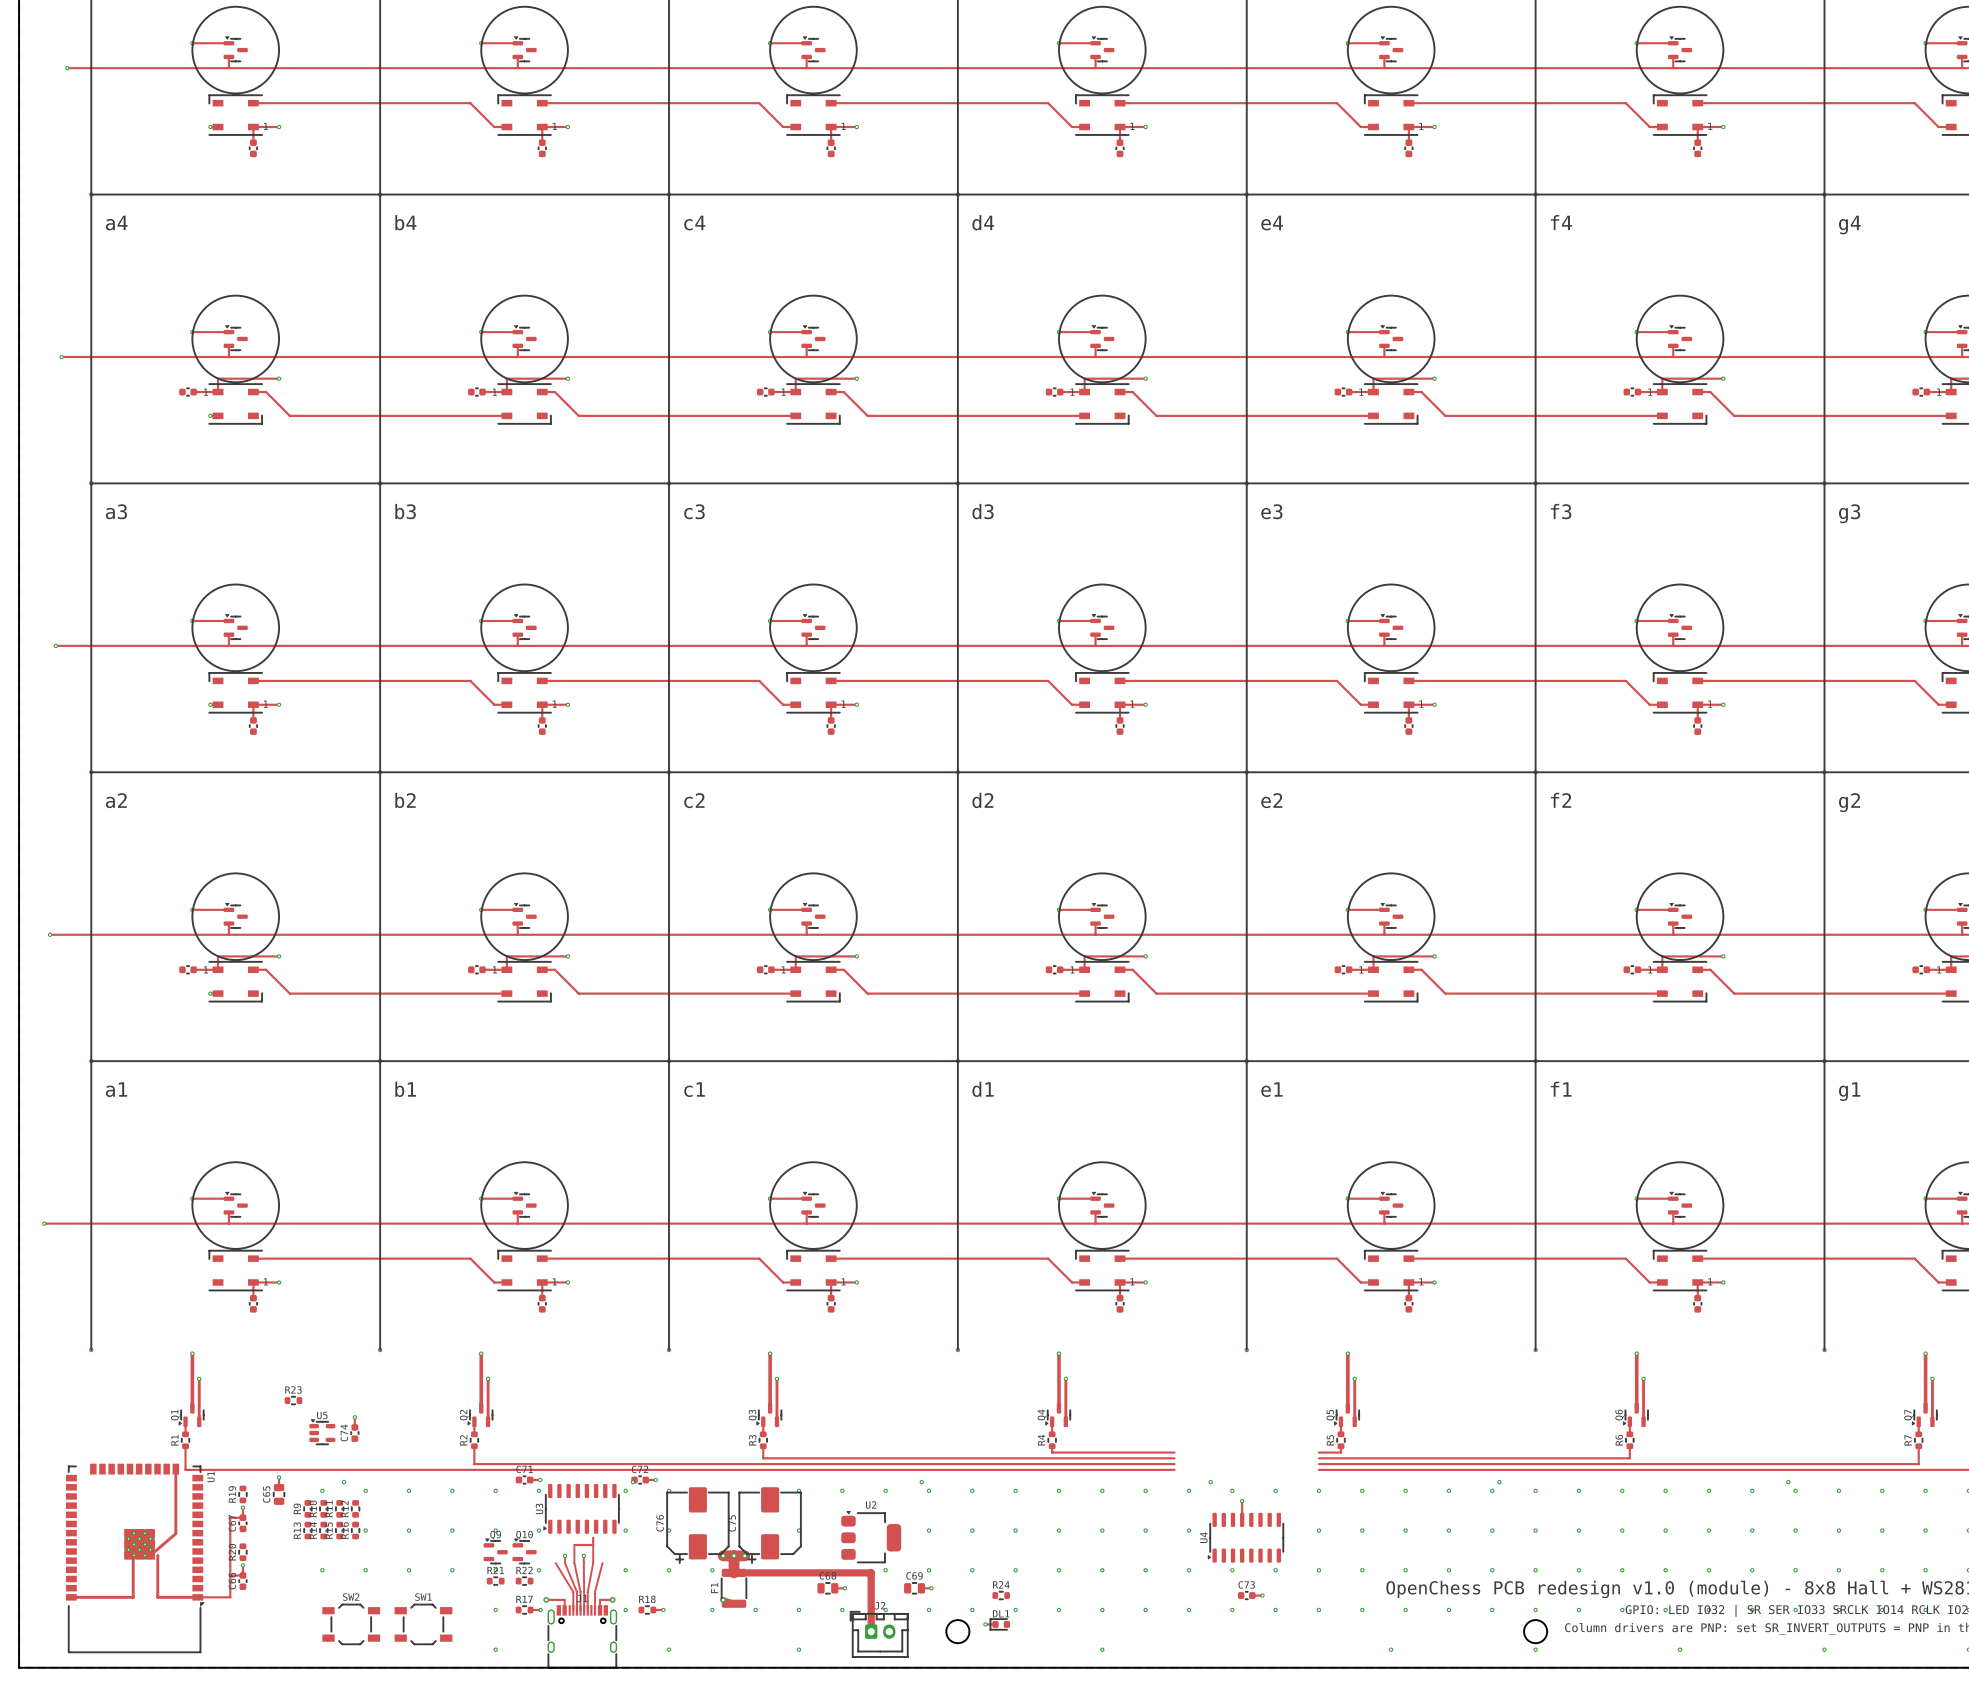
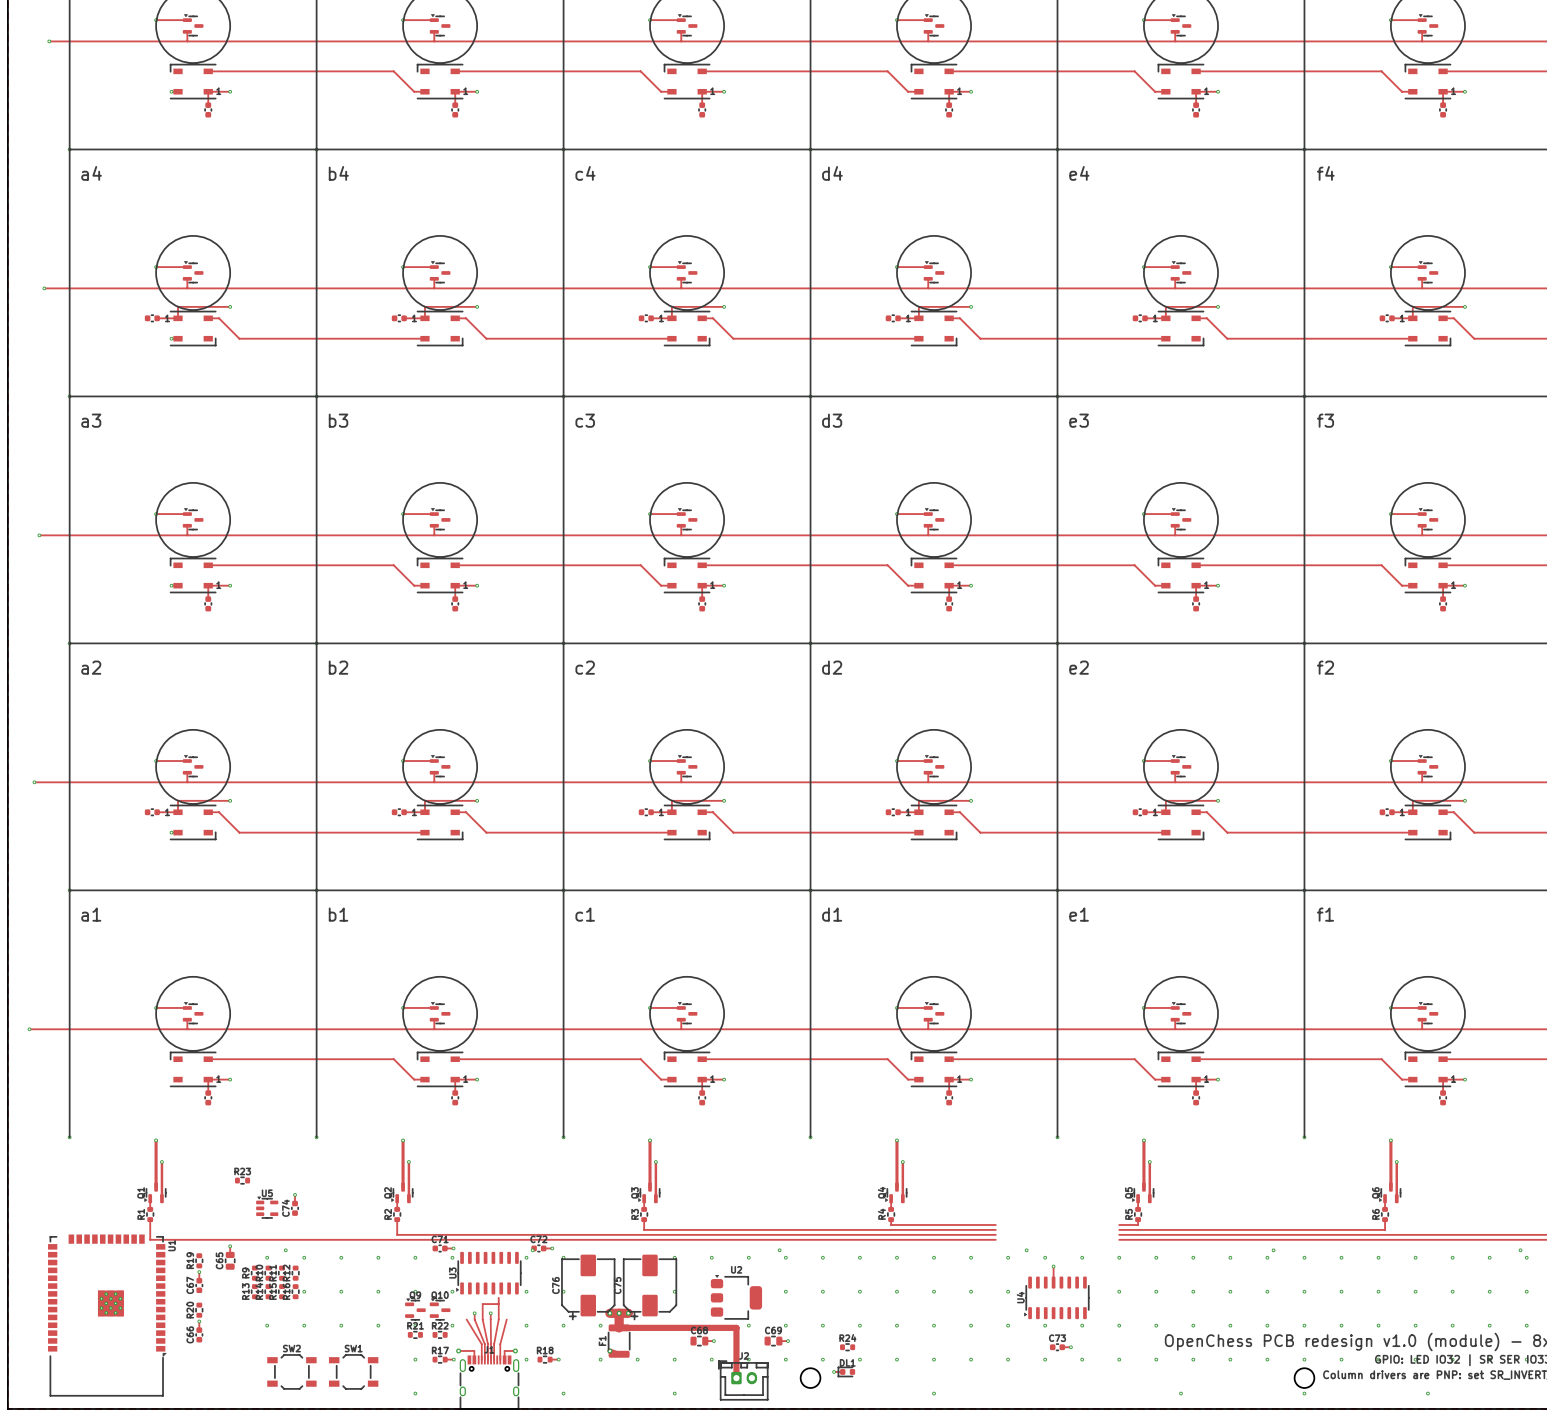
track: (175, 1469) (175, 1533) (150, 1555) -> none
track: (242, 1517) (230, 1517) (230, 1597) (157, 1597) (157, 1555) -> none
track: (133, 1555) (133, 1597) (71, 1597) -> none
track: (230, 1575) (242, 1575) -> none

